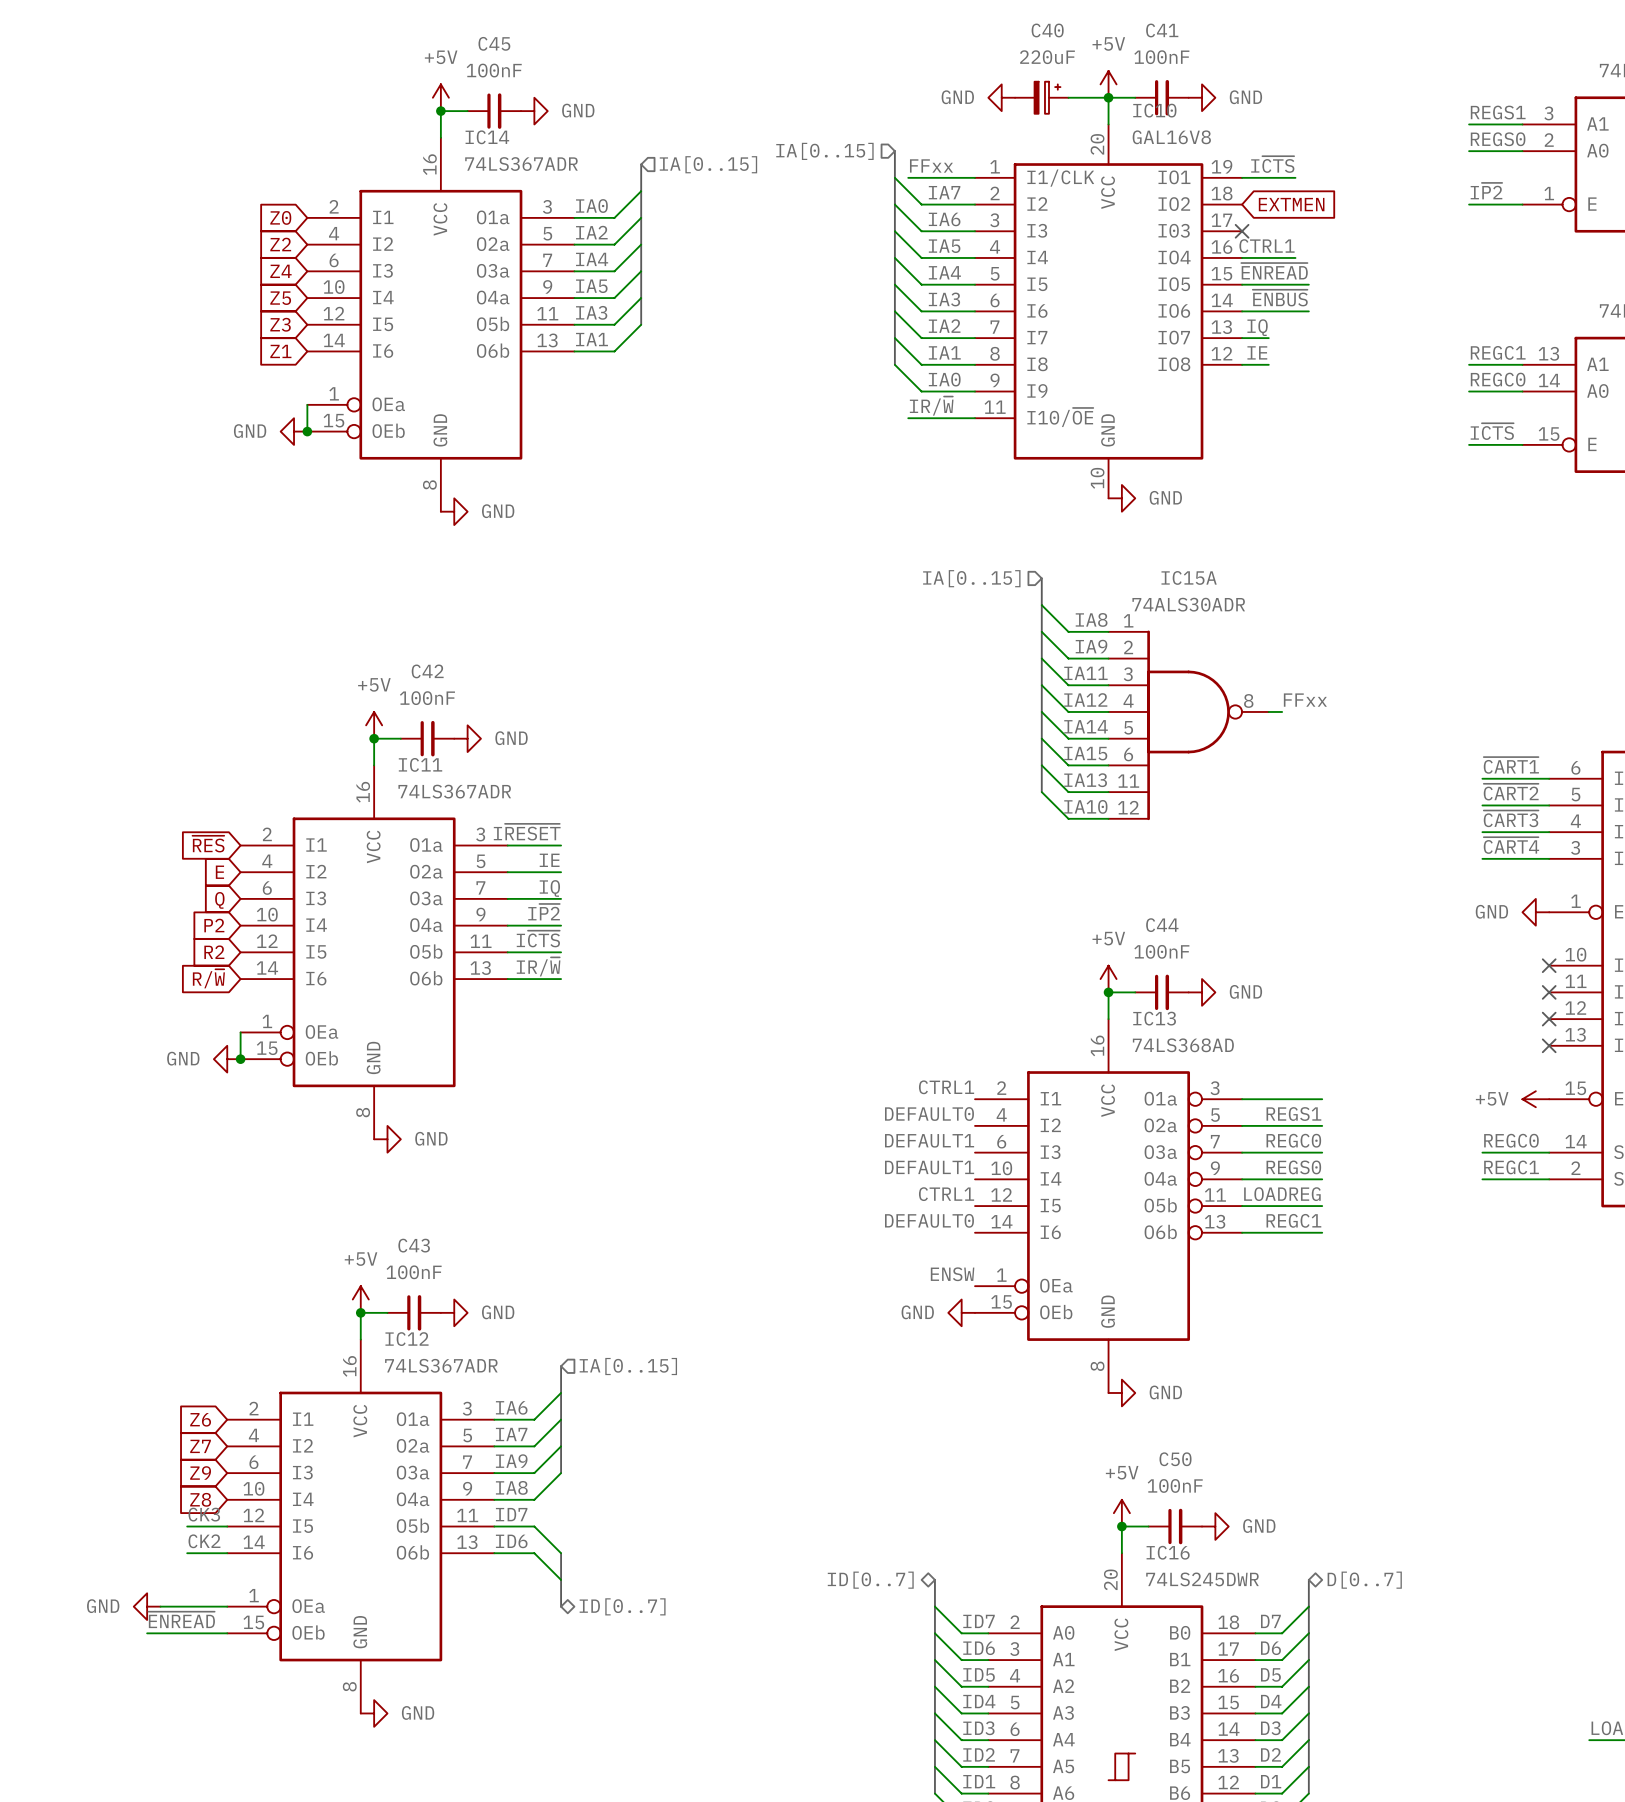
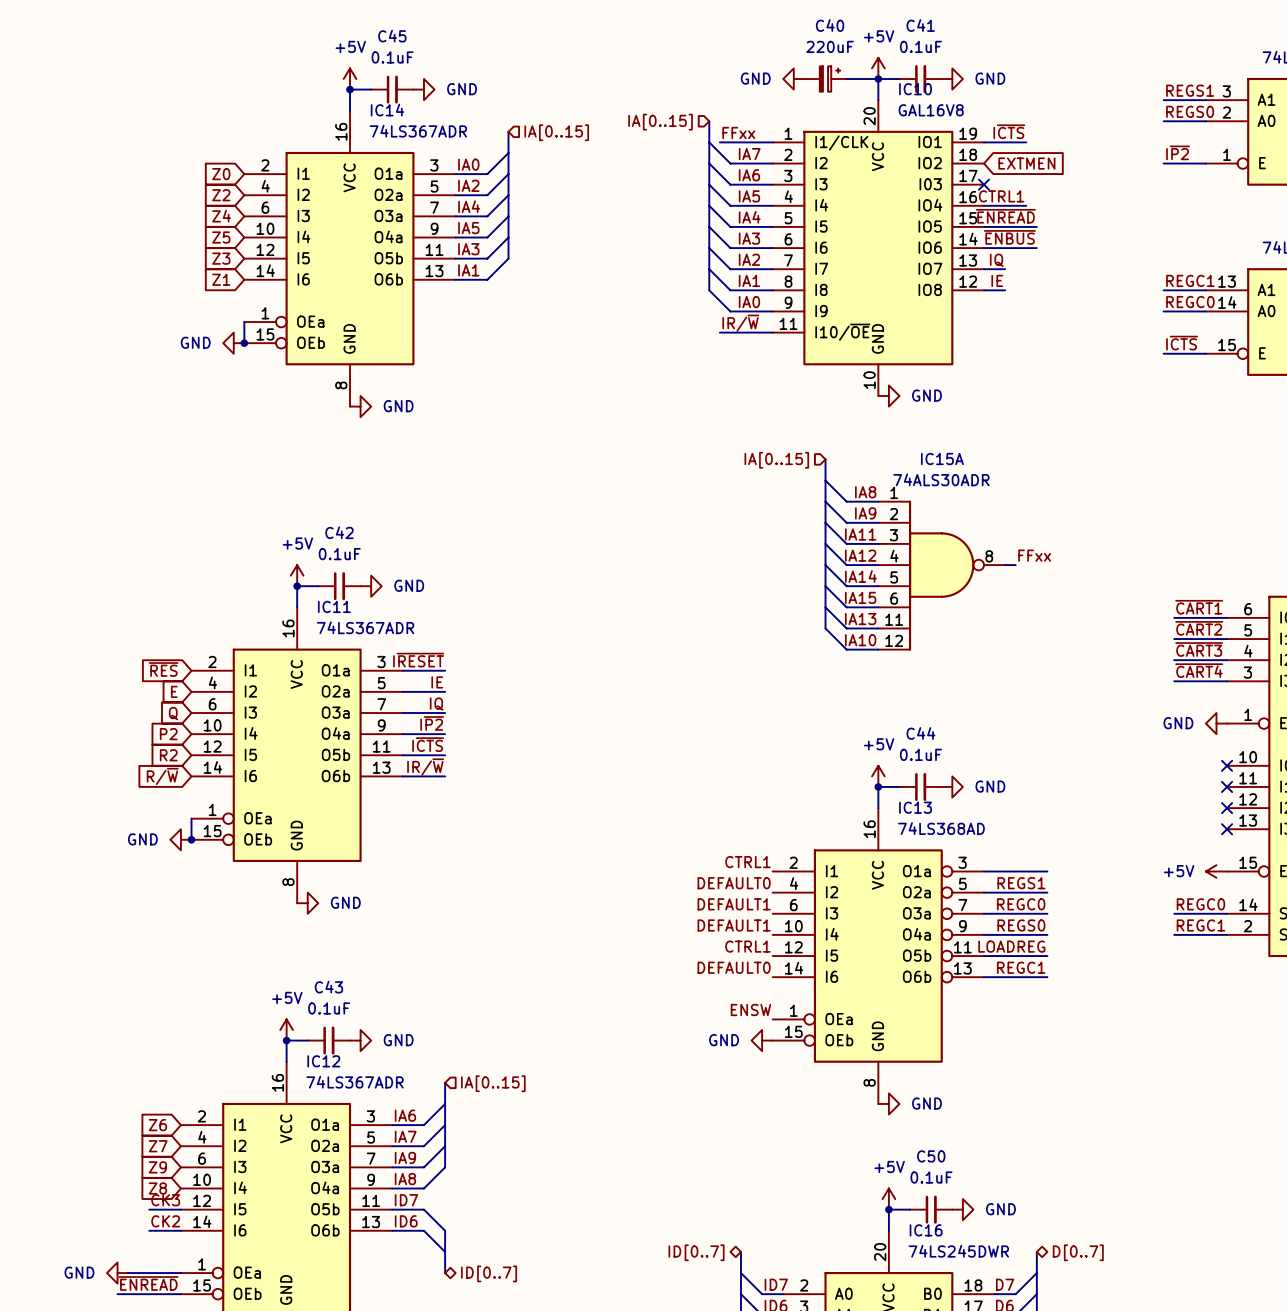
C41 value: 100nF (1161, 57) -> 0.1uF (920, 46)
C45 value: 100nF (494, 70) -> 0.1uF (392, 57)
C42 value: 100nF (427, 698) -> 0.1uF (339, 554)
C44 value: 100nF (1161, 951) -> 0.1uF (920, 754)
C43 value: 100nF (414, 1272) -> 0.1uF (329, 1008)
C50 value: 100nF (1175, 1485) -> 0.1uF (931, 1177)

